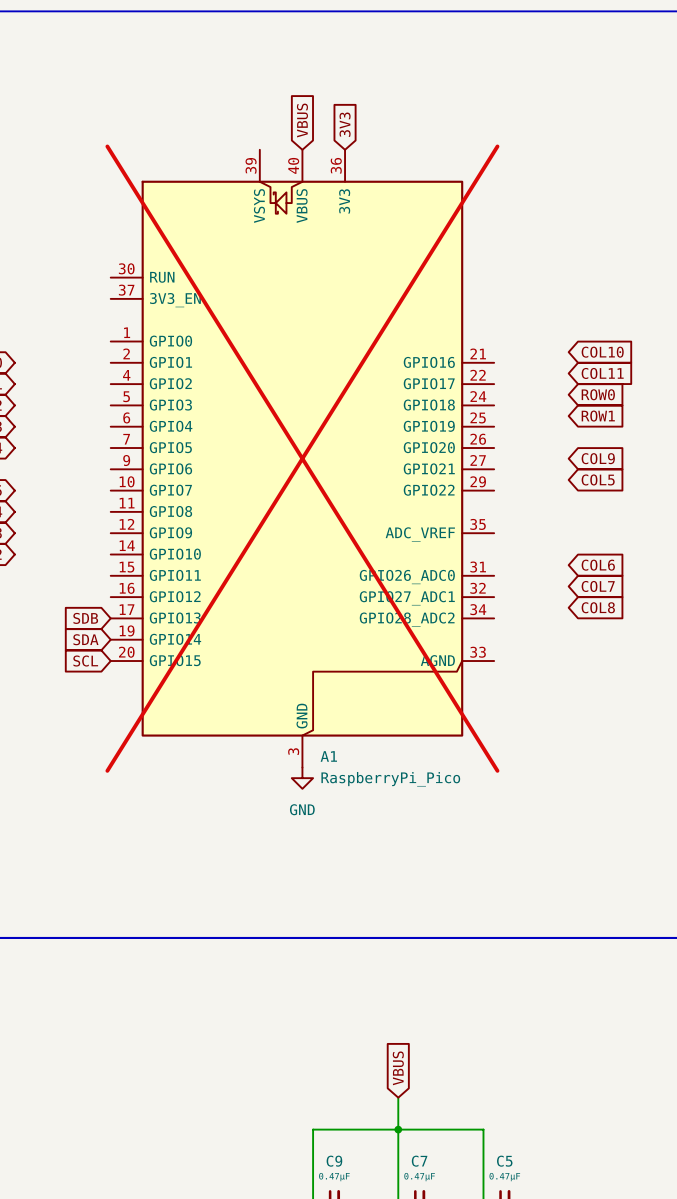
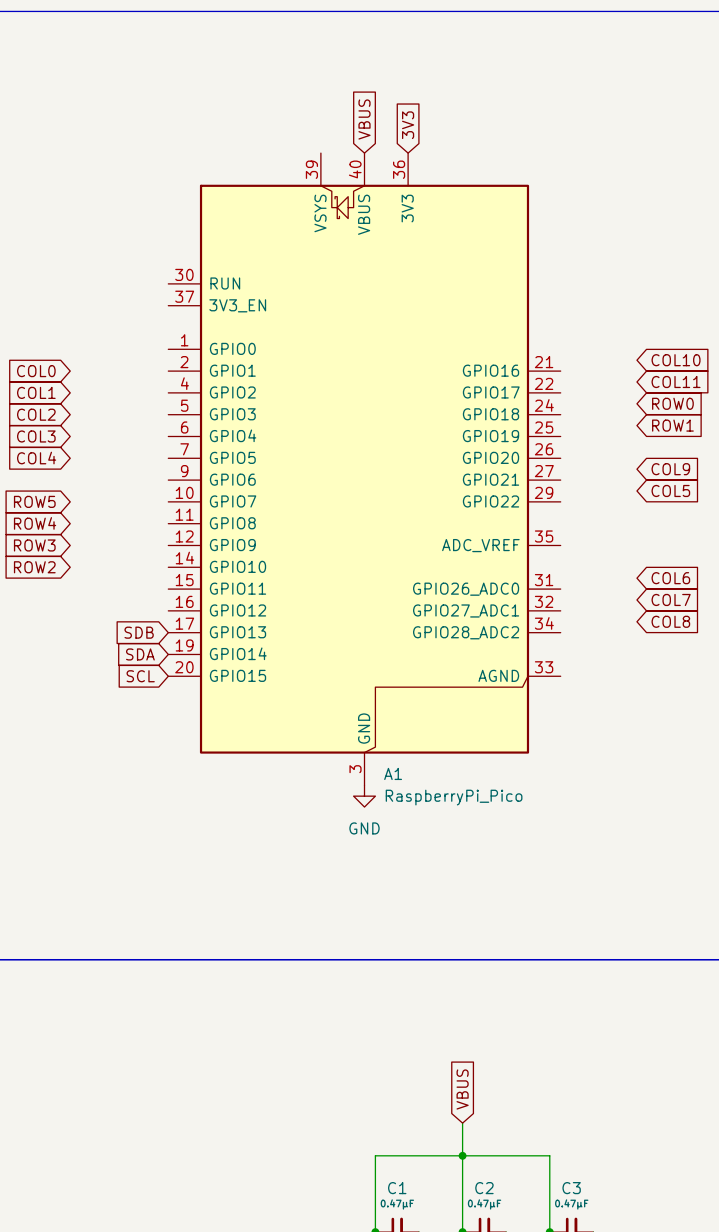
A1 do-not-place cross: (302, 458) -> none
C9 name: C9 (334, 1161) -> C1 (397, 1188)
C7 name: C7 (419, 1161) -> C2 (484, 1188)
C5 name: C5 (504, 1161) -> C3 (571, 1188)

